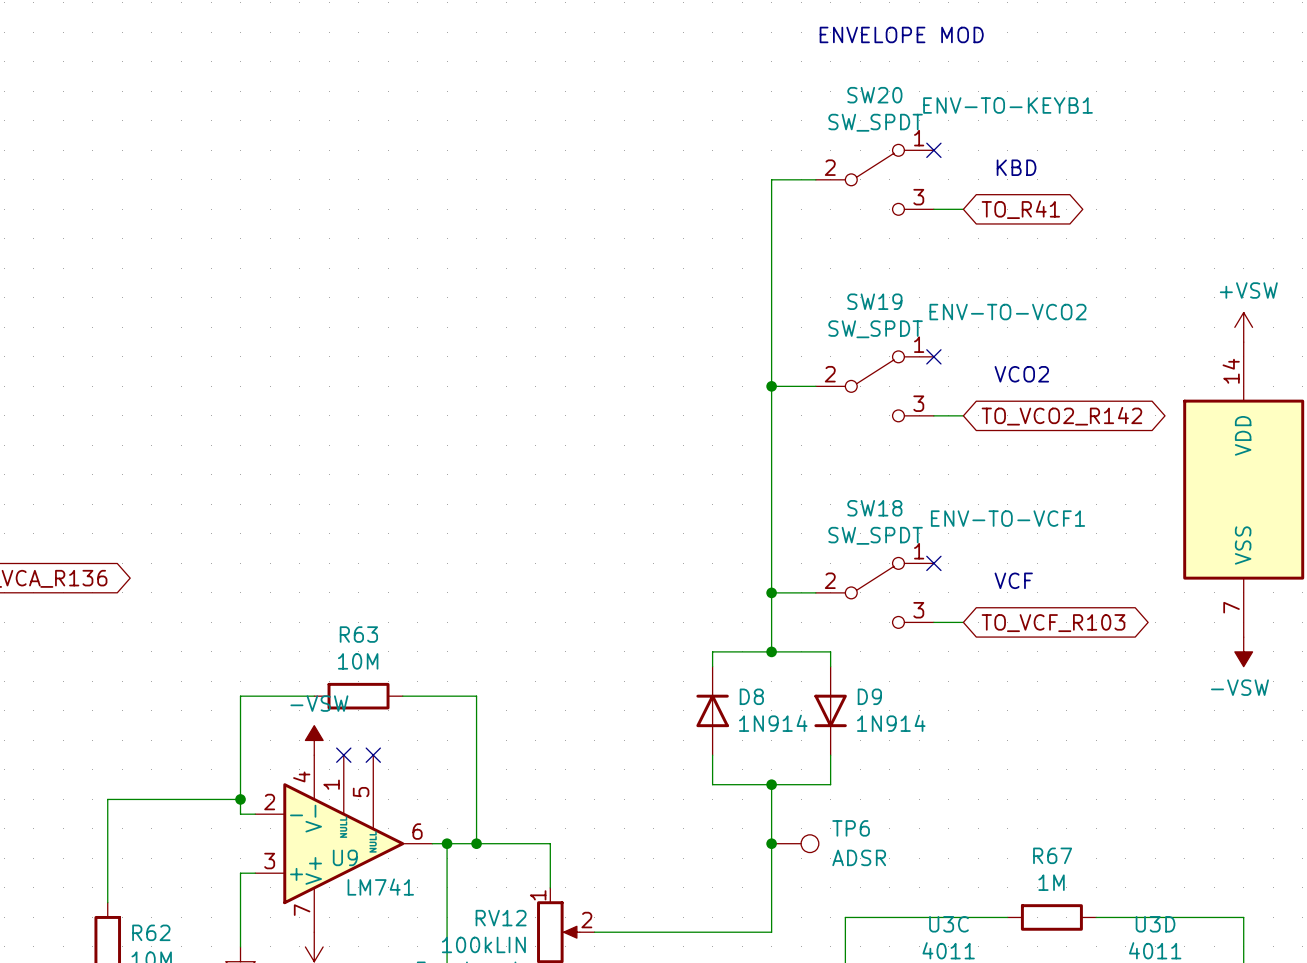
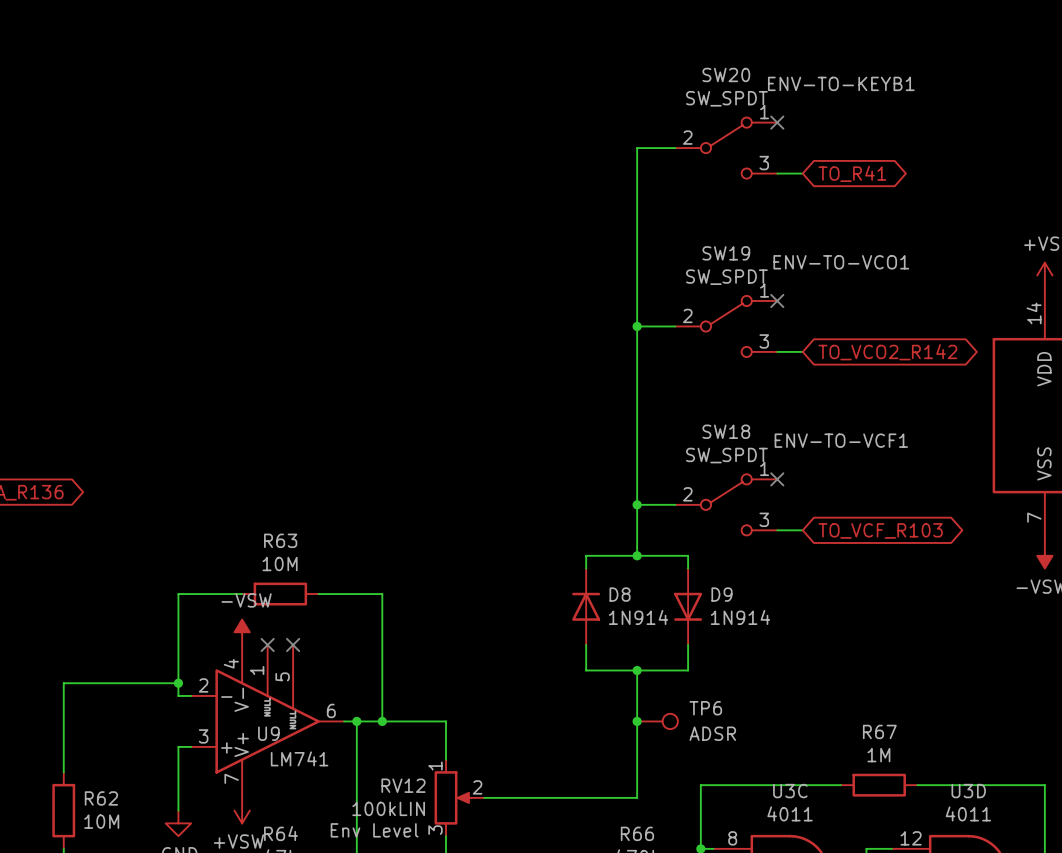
text: ENVELOPE MOD (901, 34) -> none
text: KBD (1016, 167) -> none
SW19 text: ENV-TO-VCO2 (1008, 312) -> ENV-TO-VCO1 (841, 262)
text: VCO2 (1021, 374) -> none
text: VCF (1013, 580) -> none

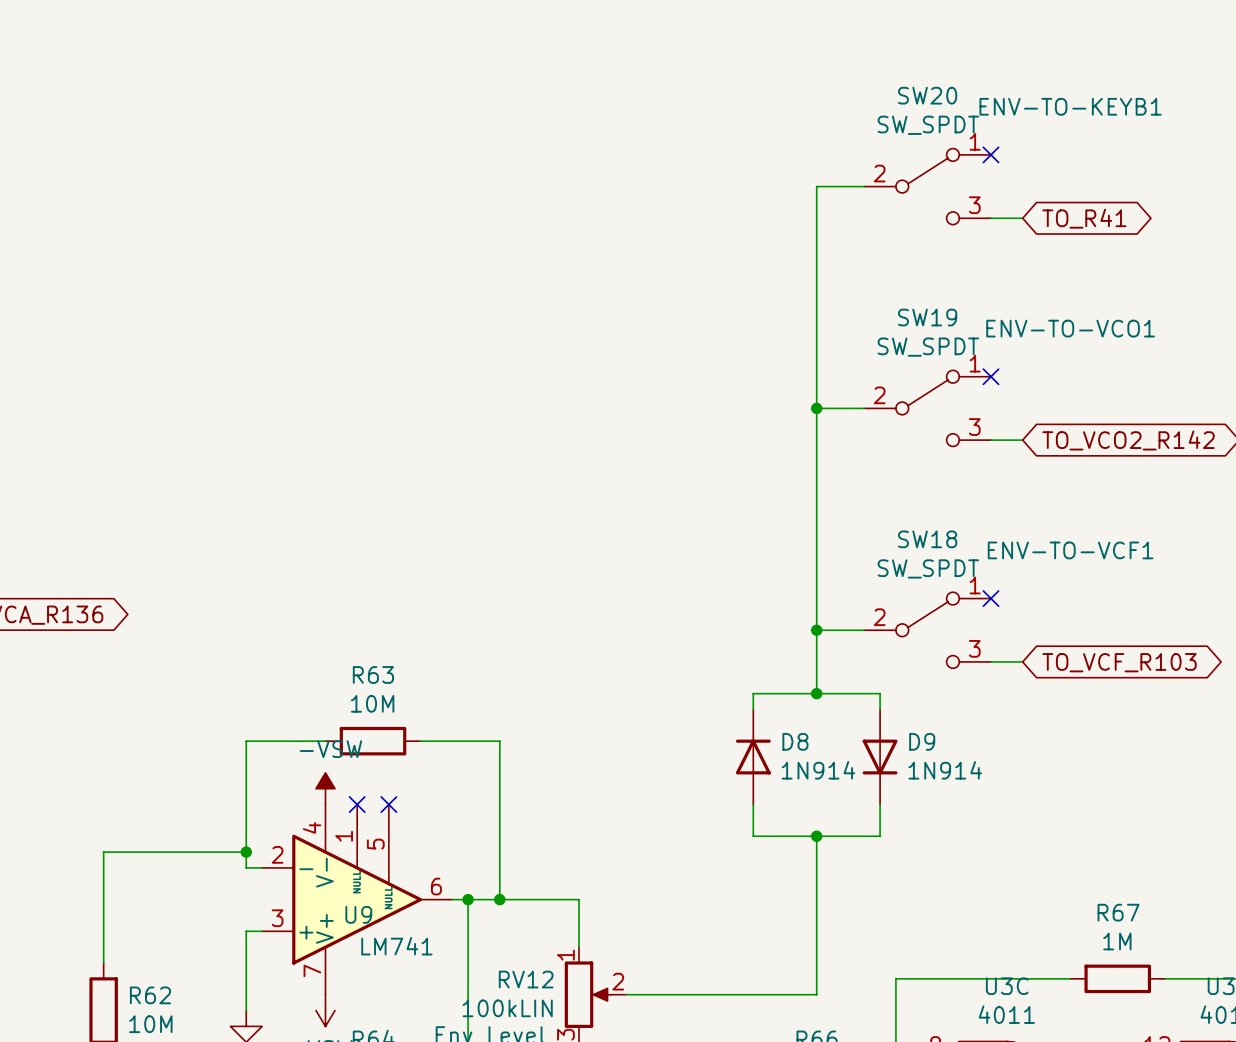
junction: (637, 721) -> none
TP6: ADSR (657, 721) -> none

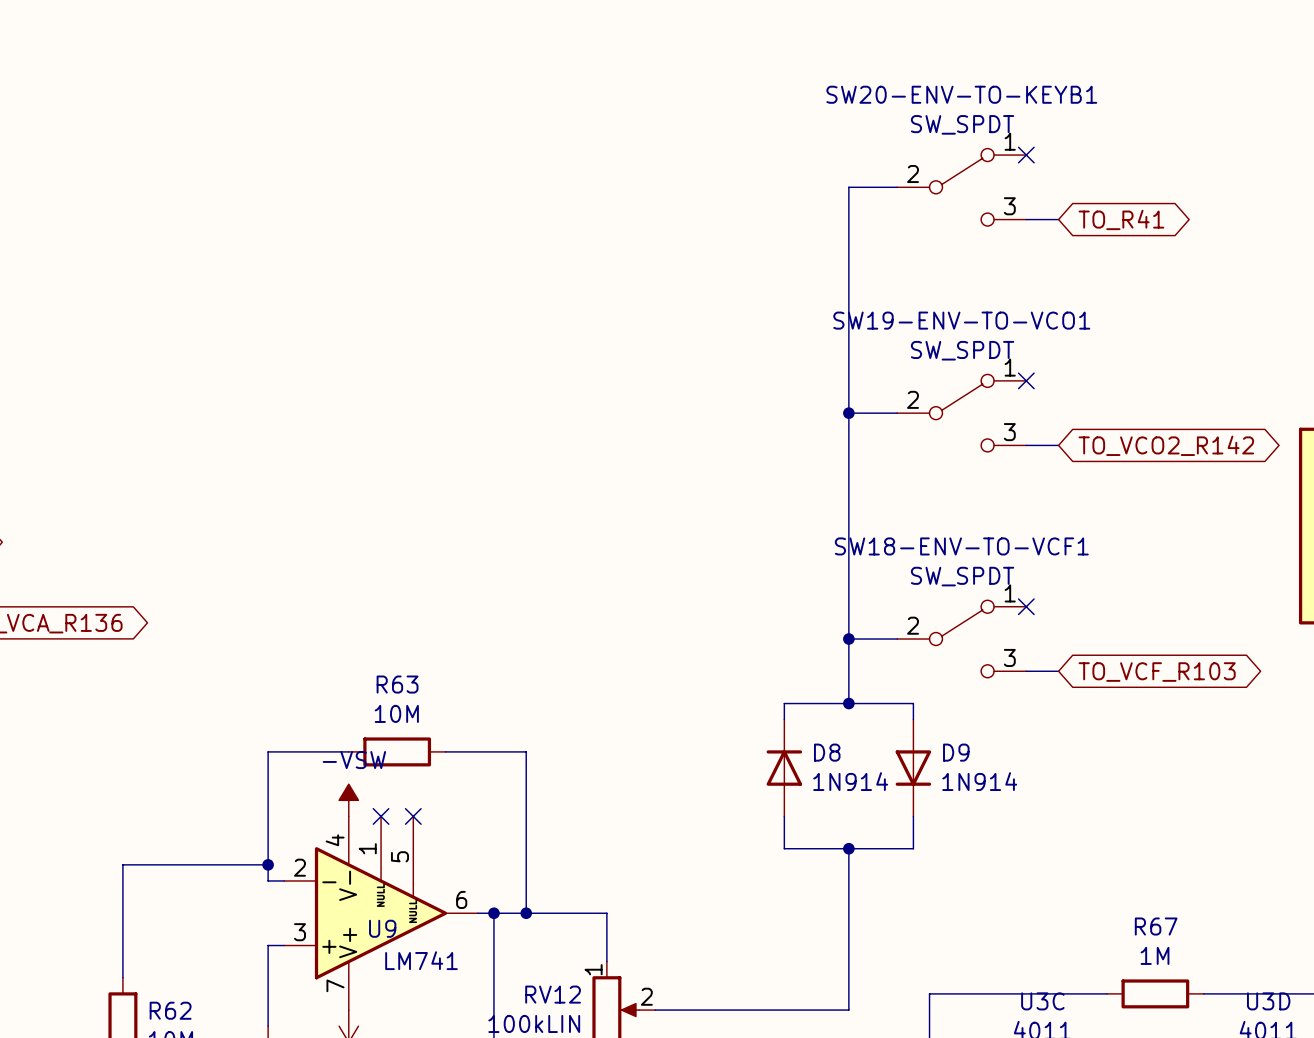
SW20 name: SW20 (927, 95) -> SW20-ENV-TO-KEYB1 (961, 94)
SW20 text: ENV-TO-KEYB1 (1070, 106) -> none
SW19 name: SW19 (927, 317) -> SW19-ENV-TO-VCO1 (961, 320)
SW19 text: ENV-TO-VCO1 (1070, 328) -> none
SW18 name: SW18 (927, 539) -> SW18-ENV-TO-VCF1 (961, 546)
SW18 text: ENV-TO-VCF1 (1070, 550) -> none

